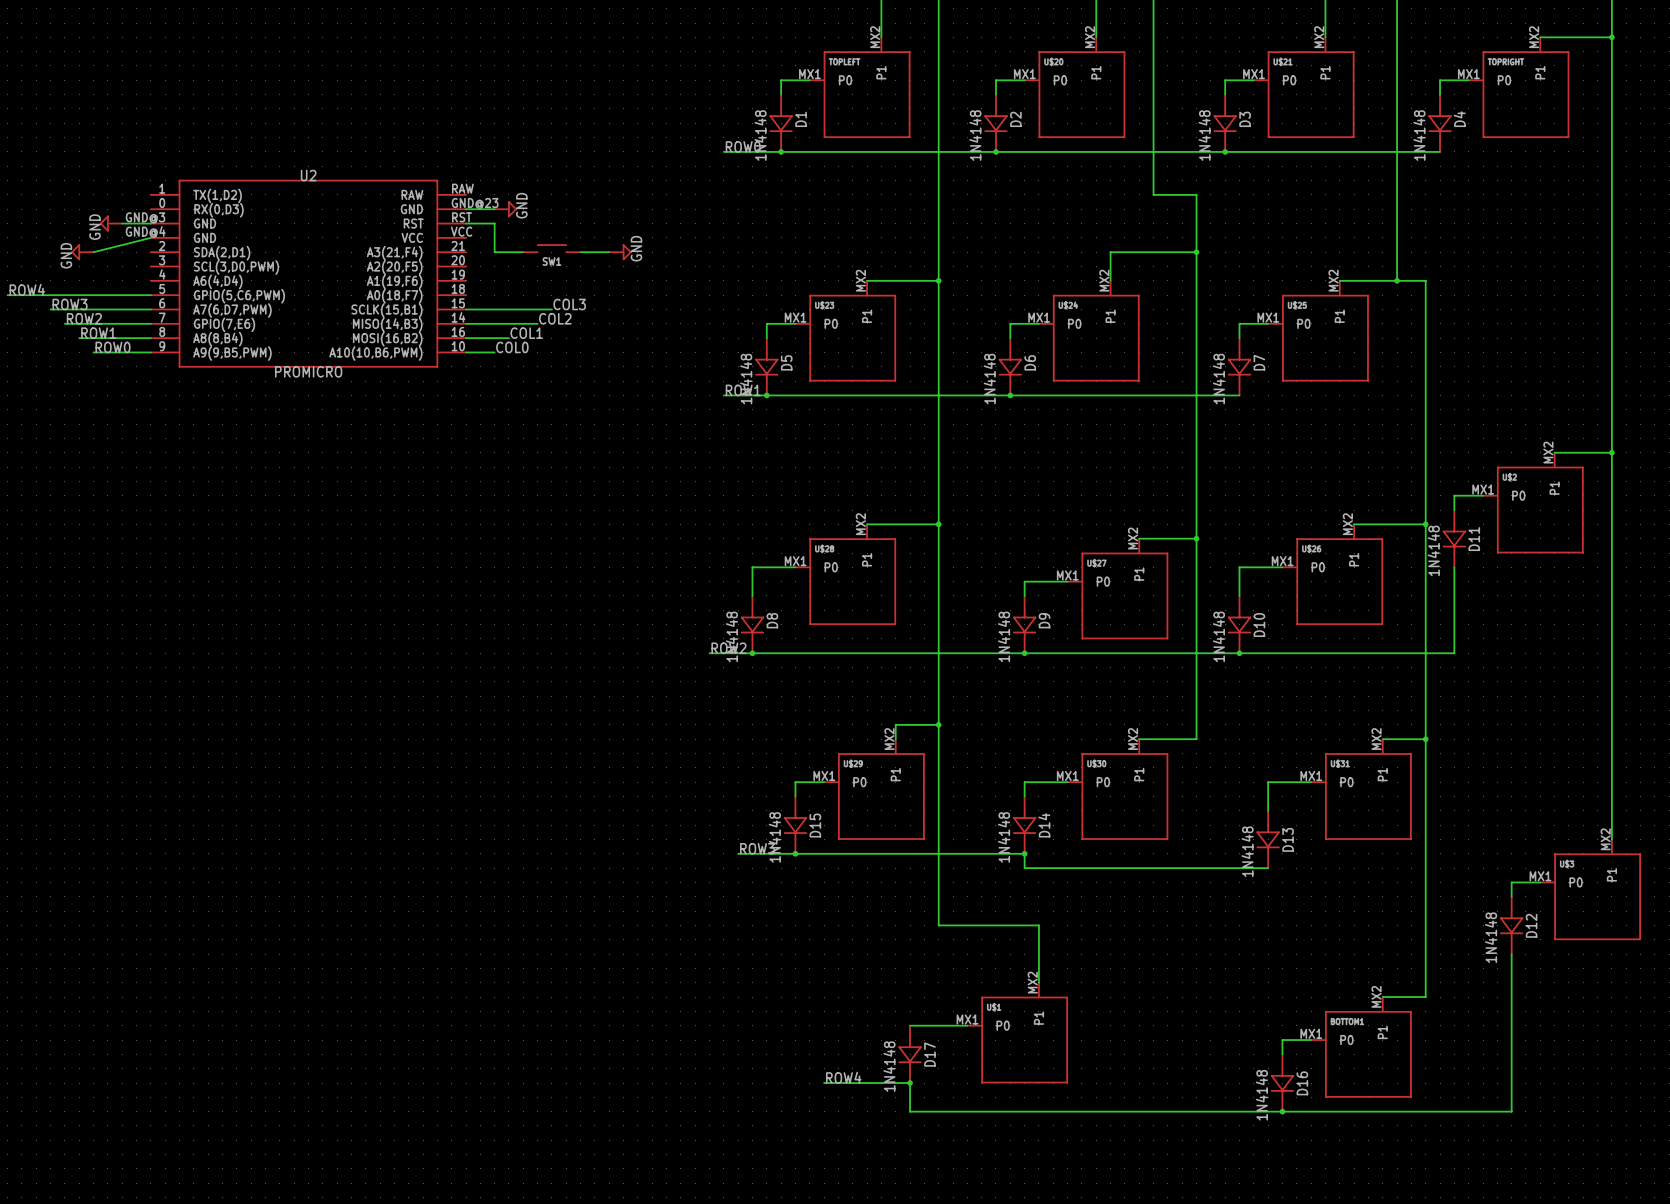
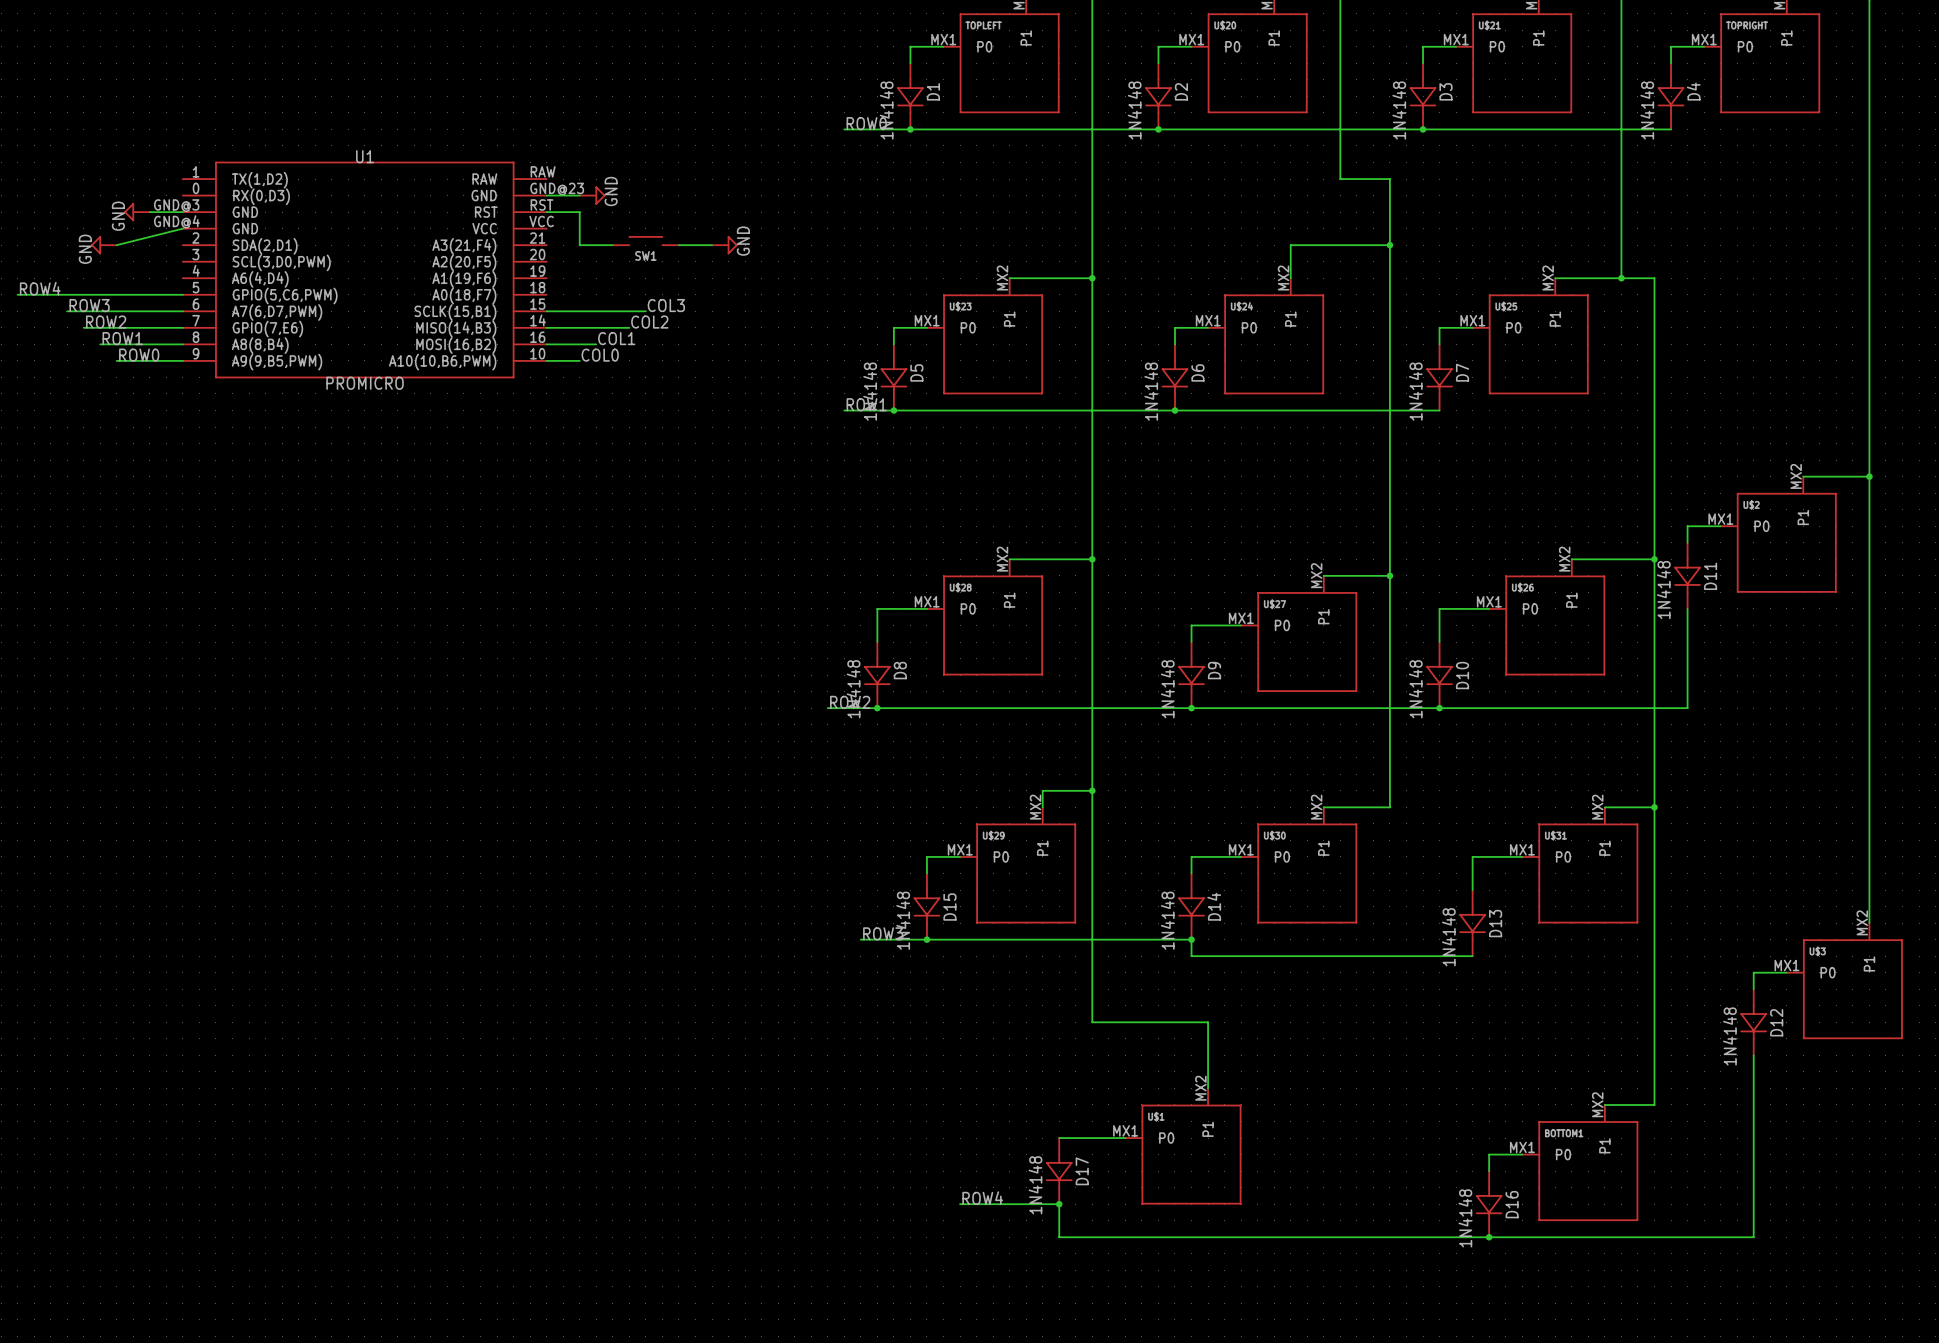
U2 name: U2 (308, 175) -> U1 (365, 156)

